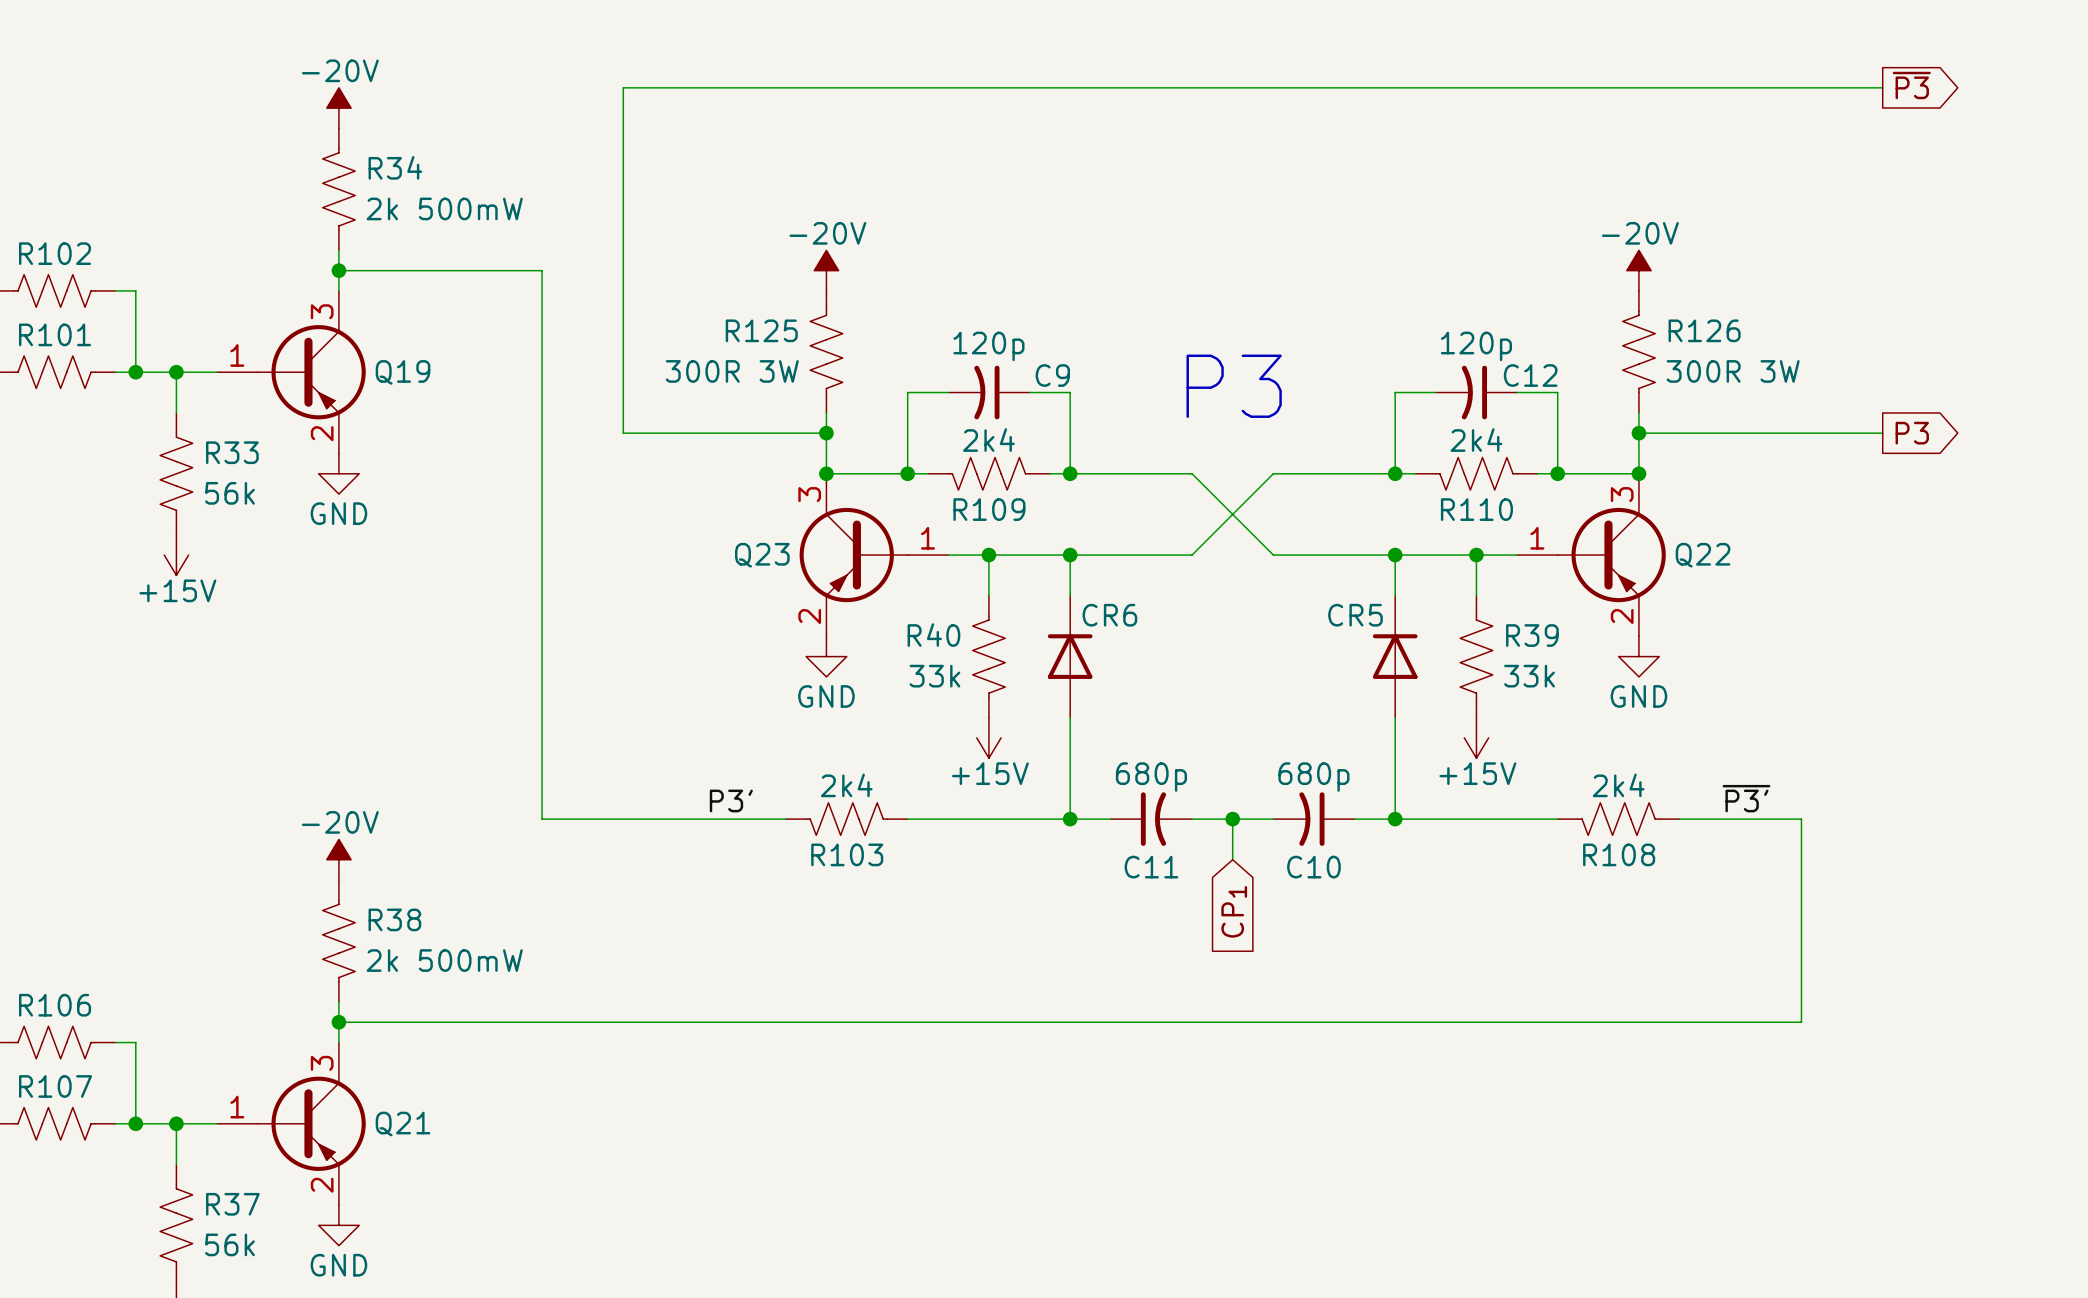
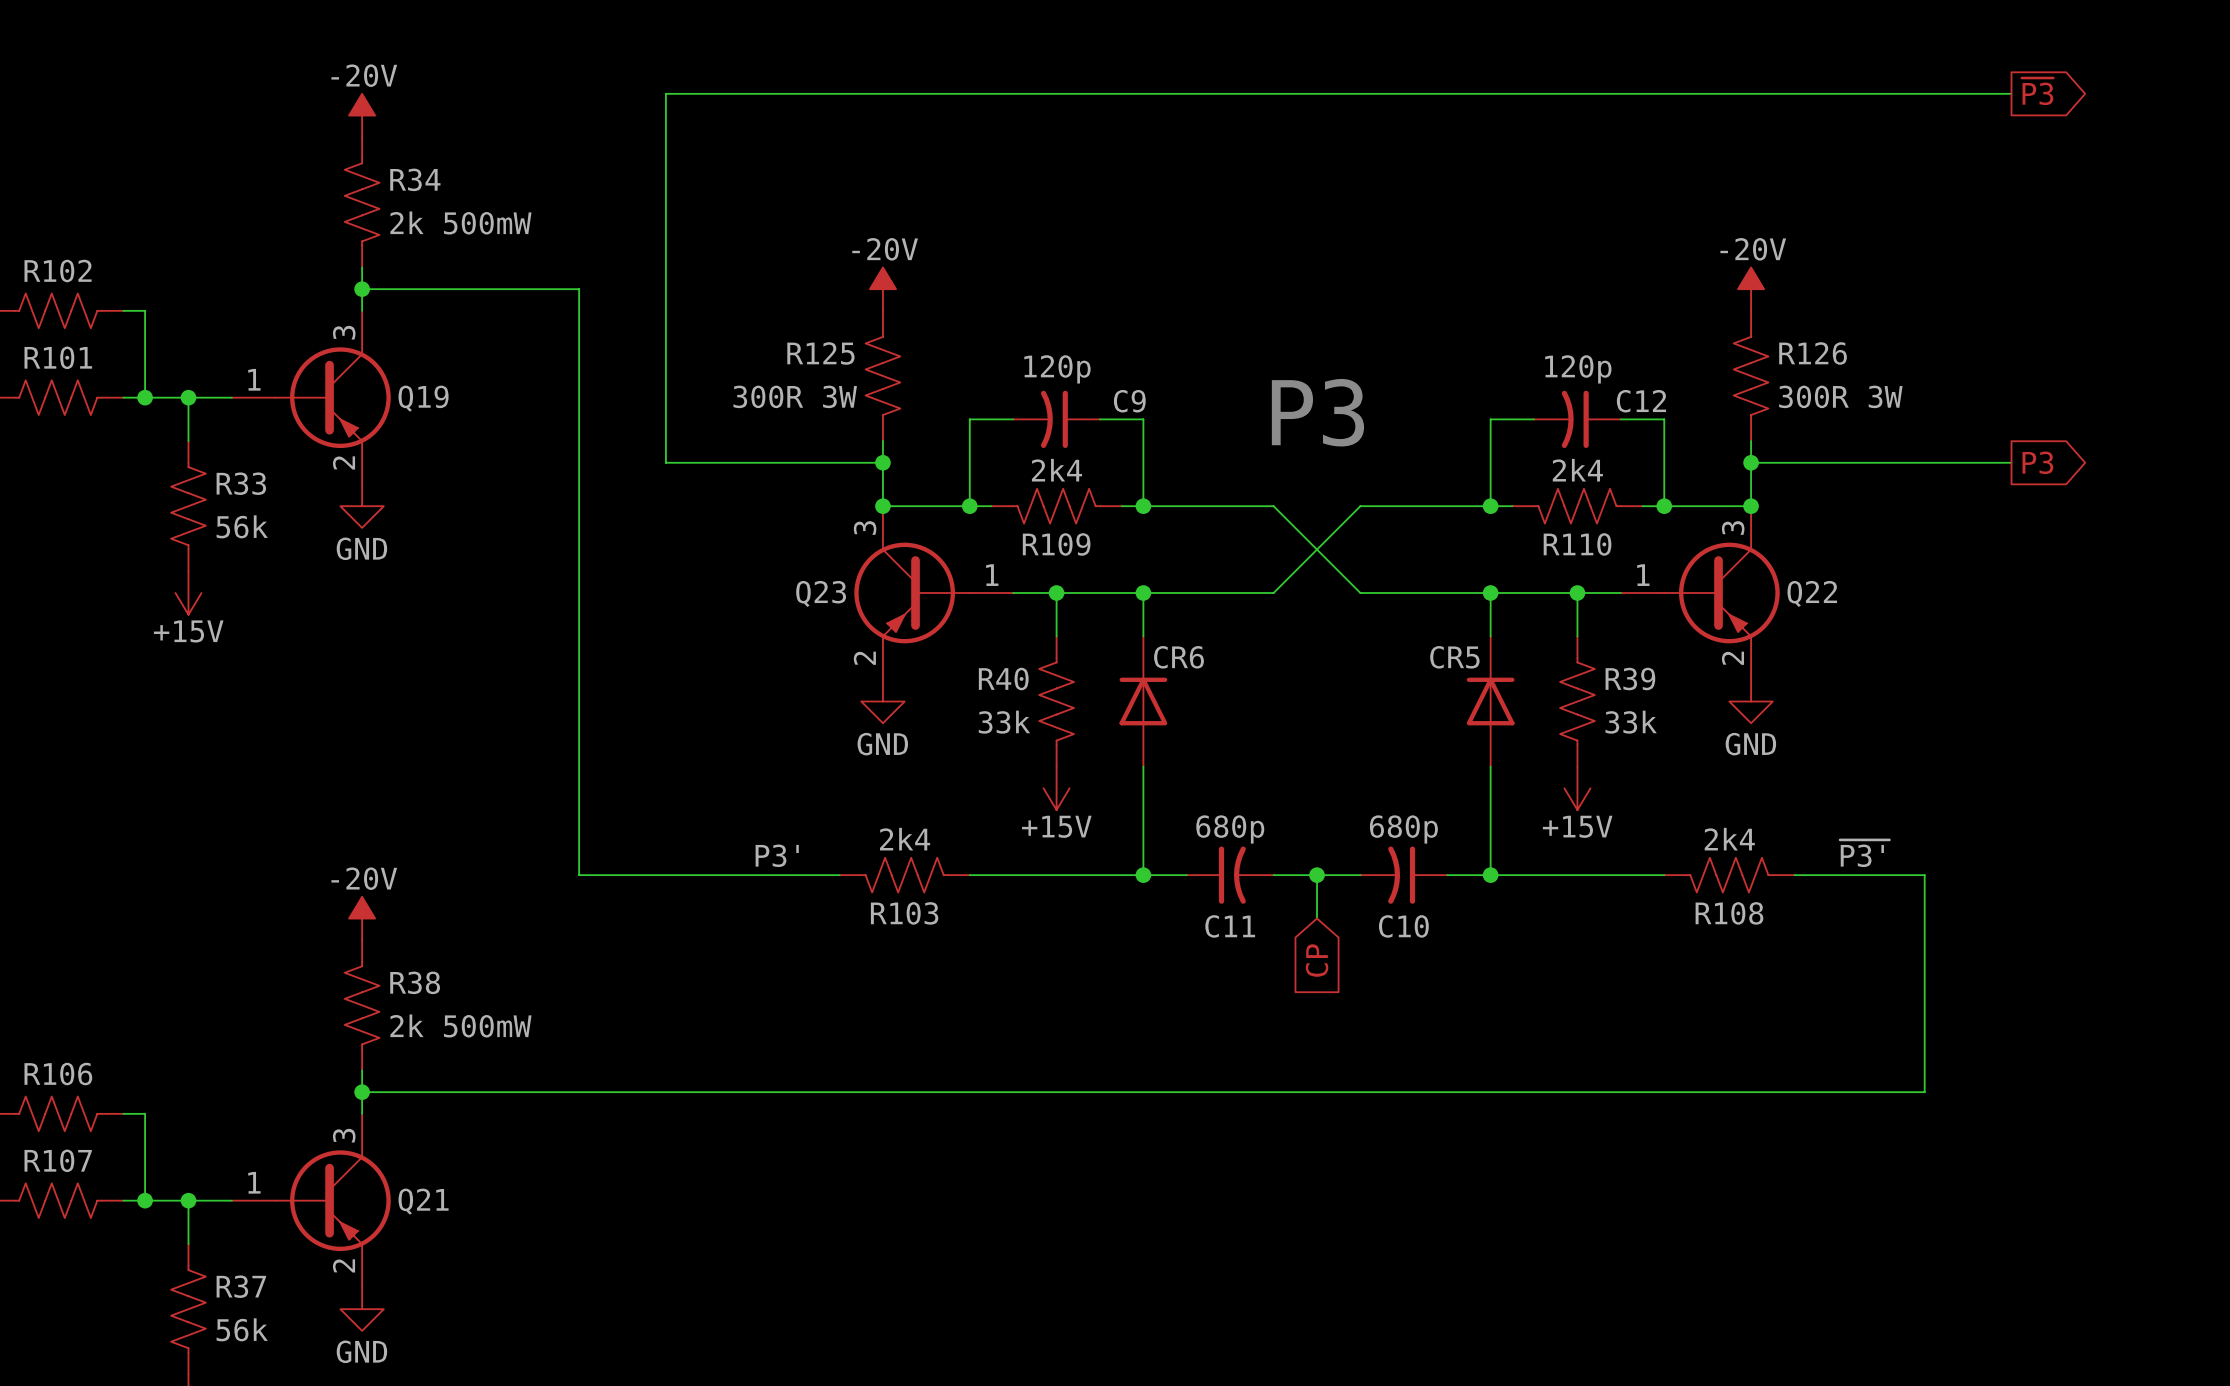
global label: CP1 (1234, 911) -> CP (1317, 960)

